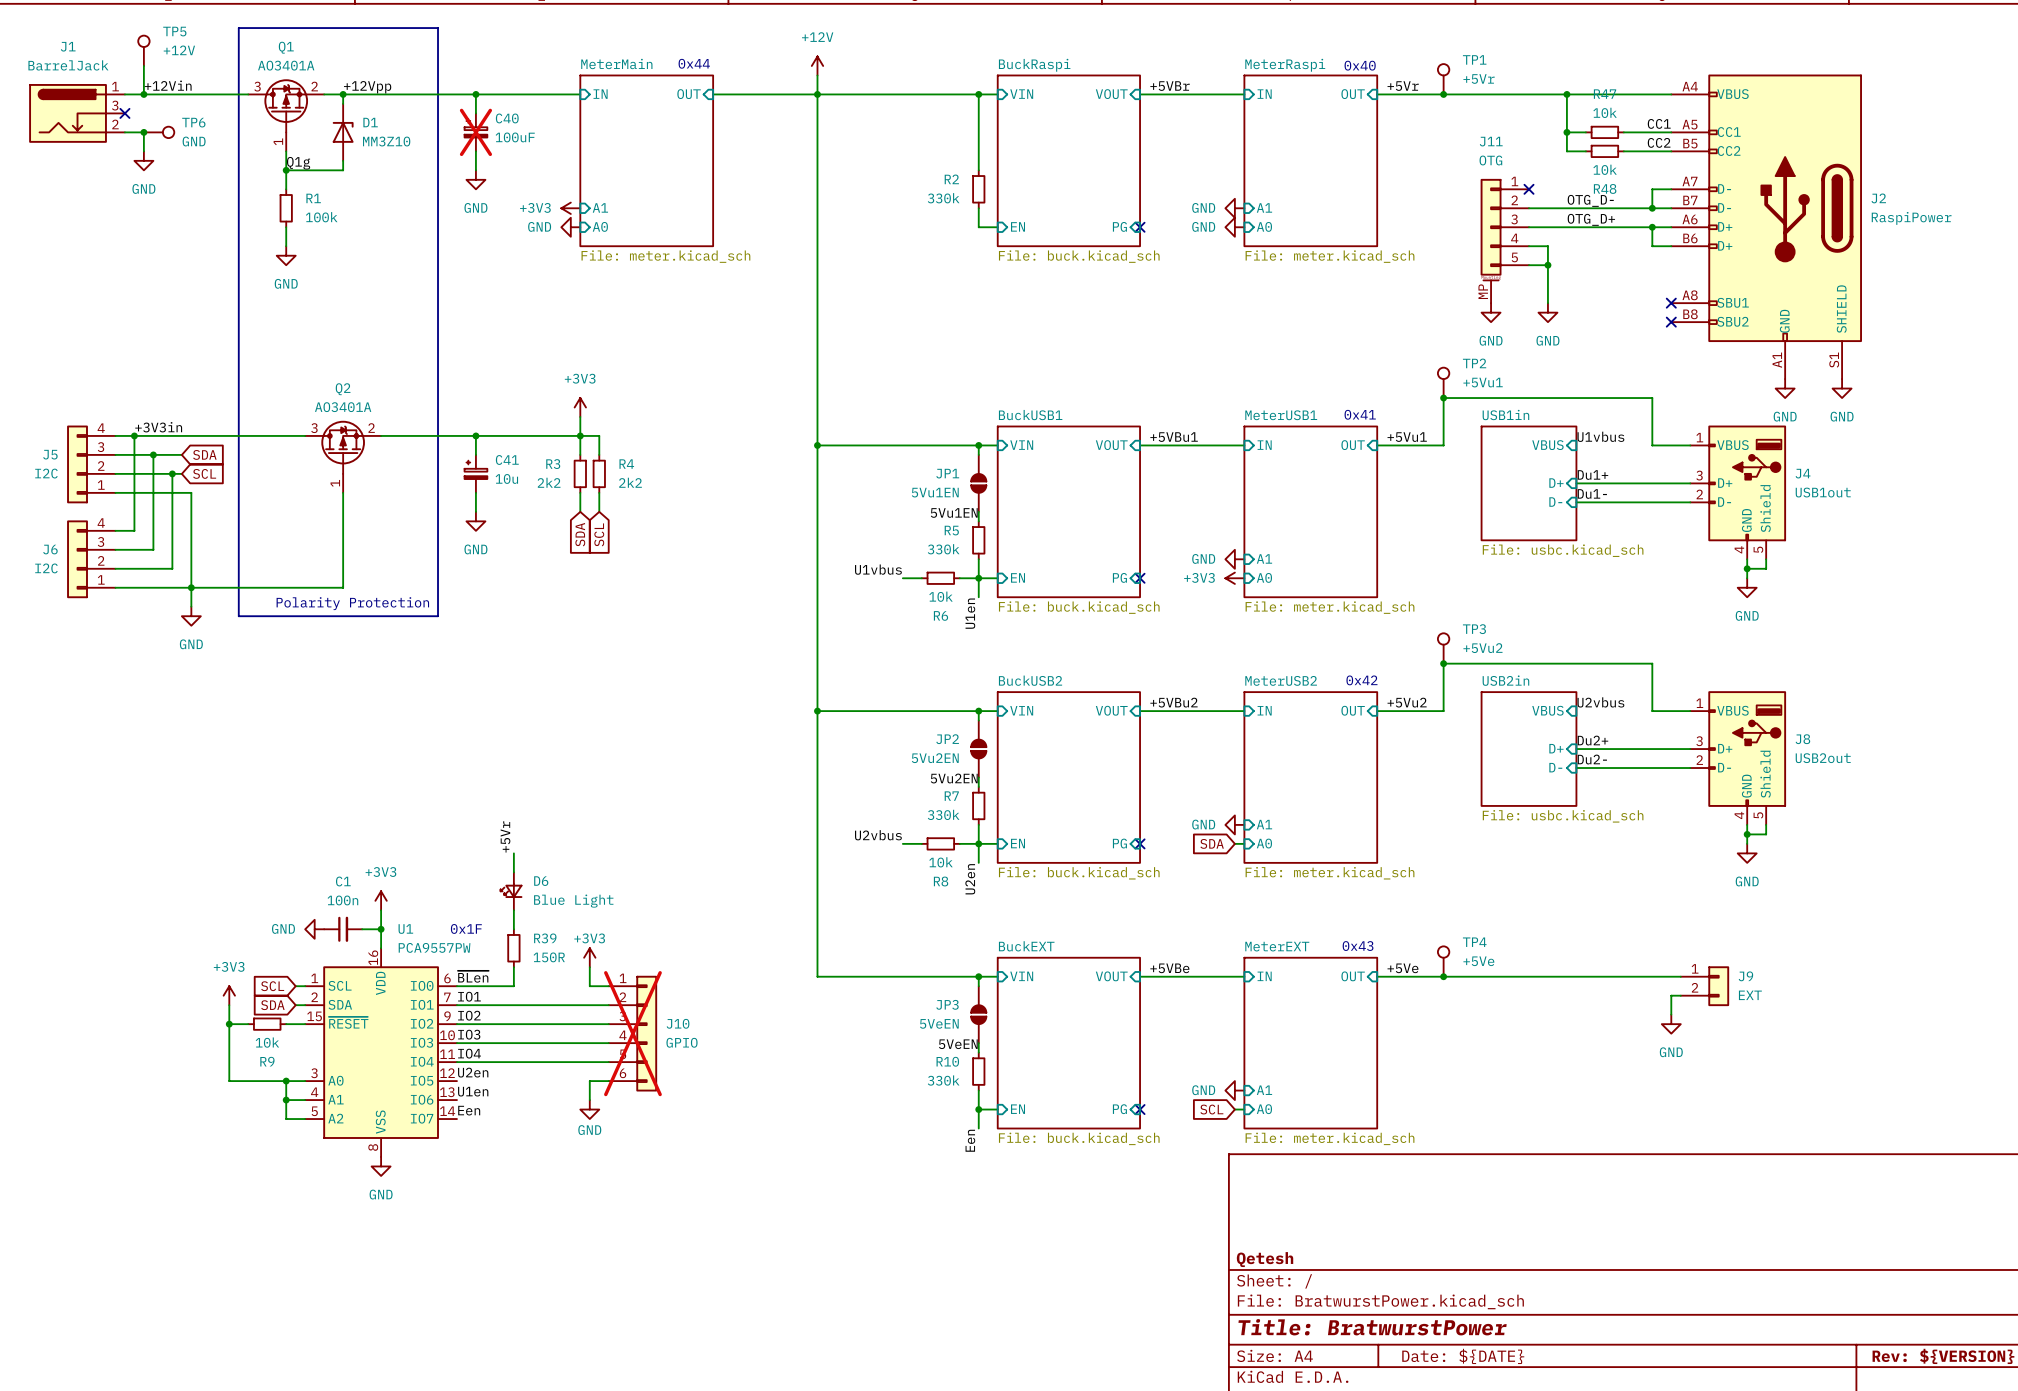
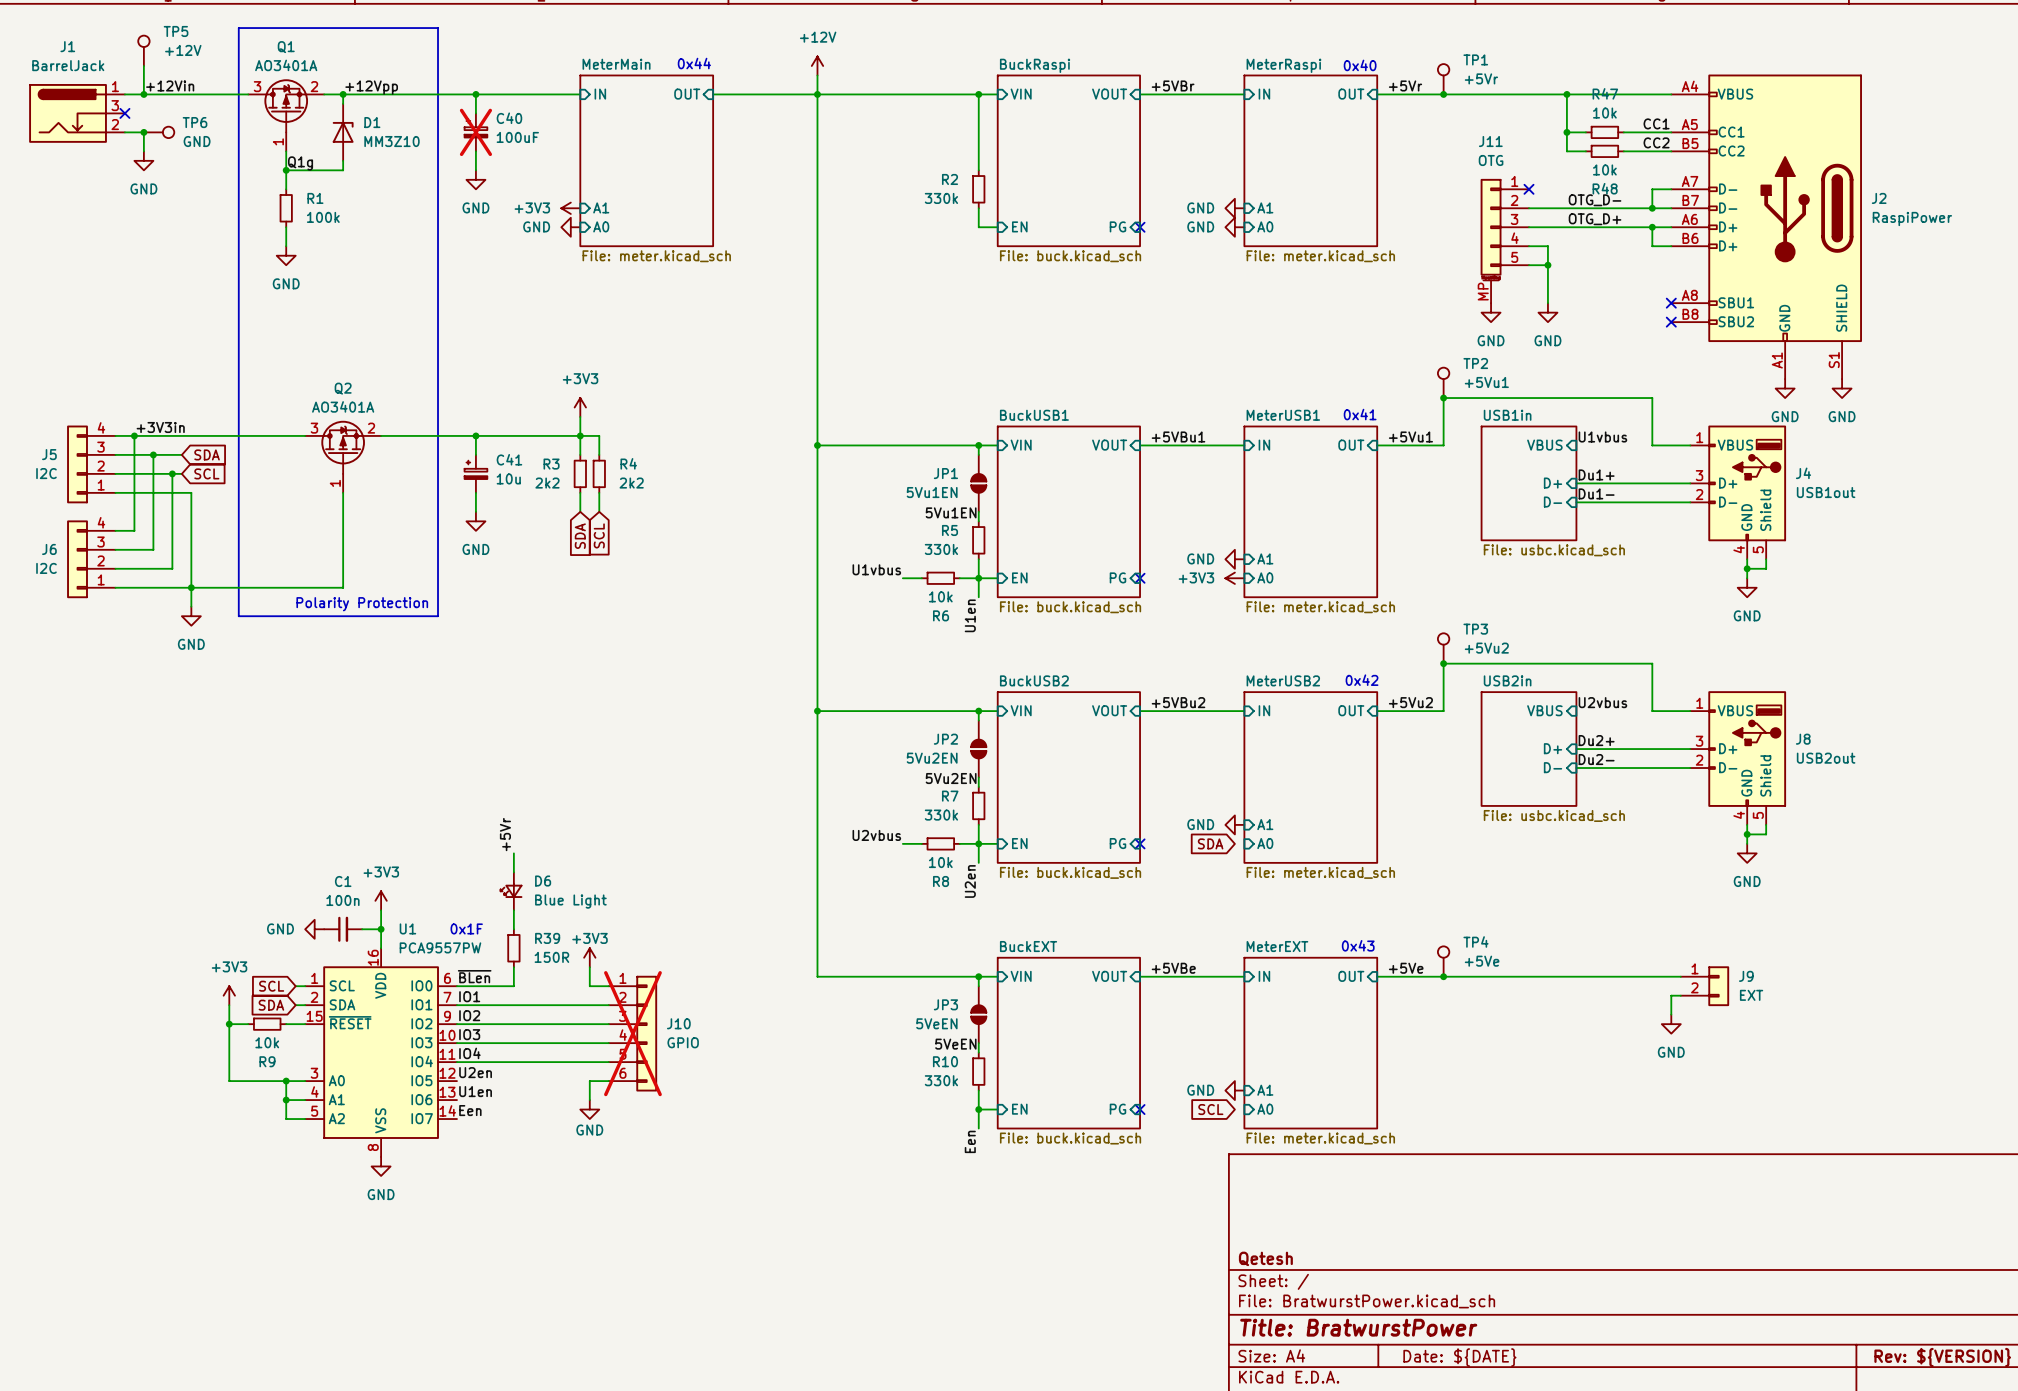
wire: (1234, 843) (1244, 843) -> none
wire: (1234, 1109) (1244, 1109) -> none

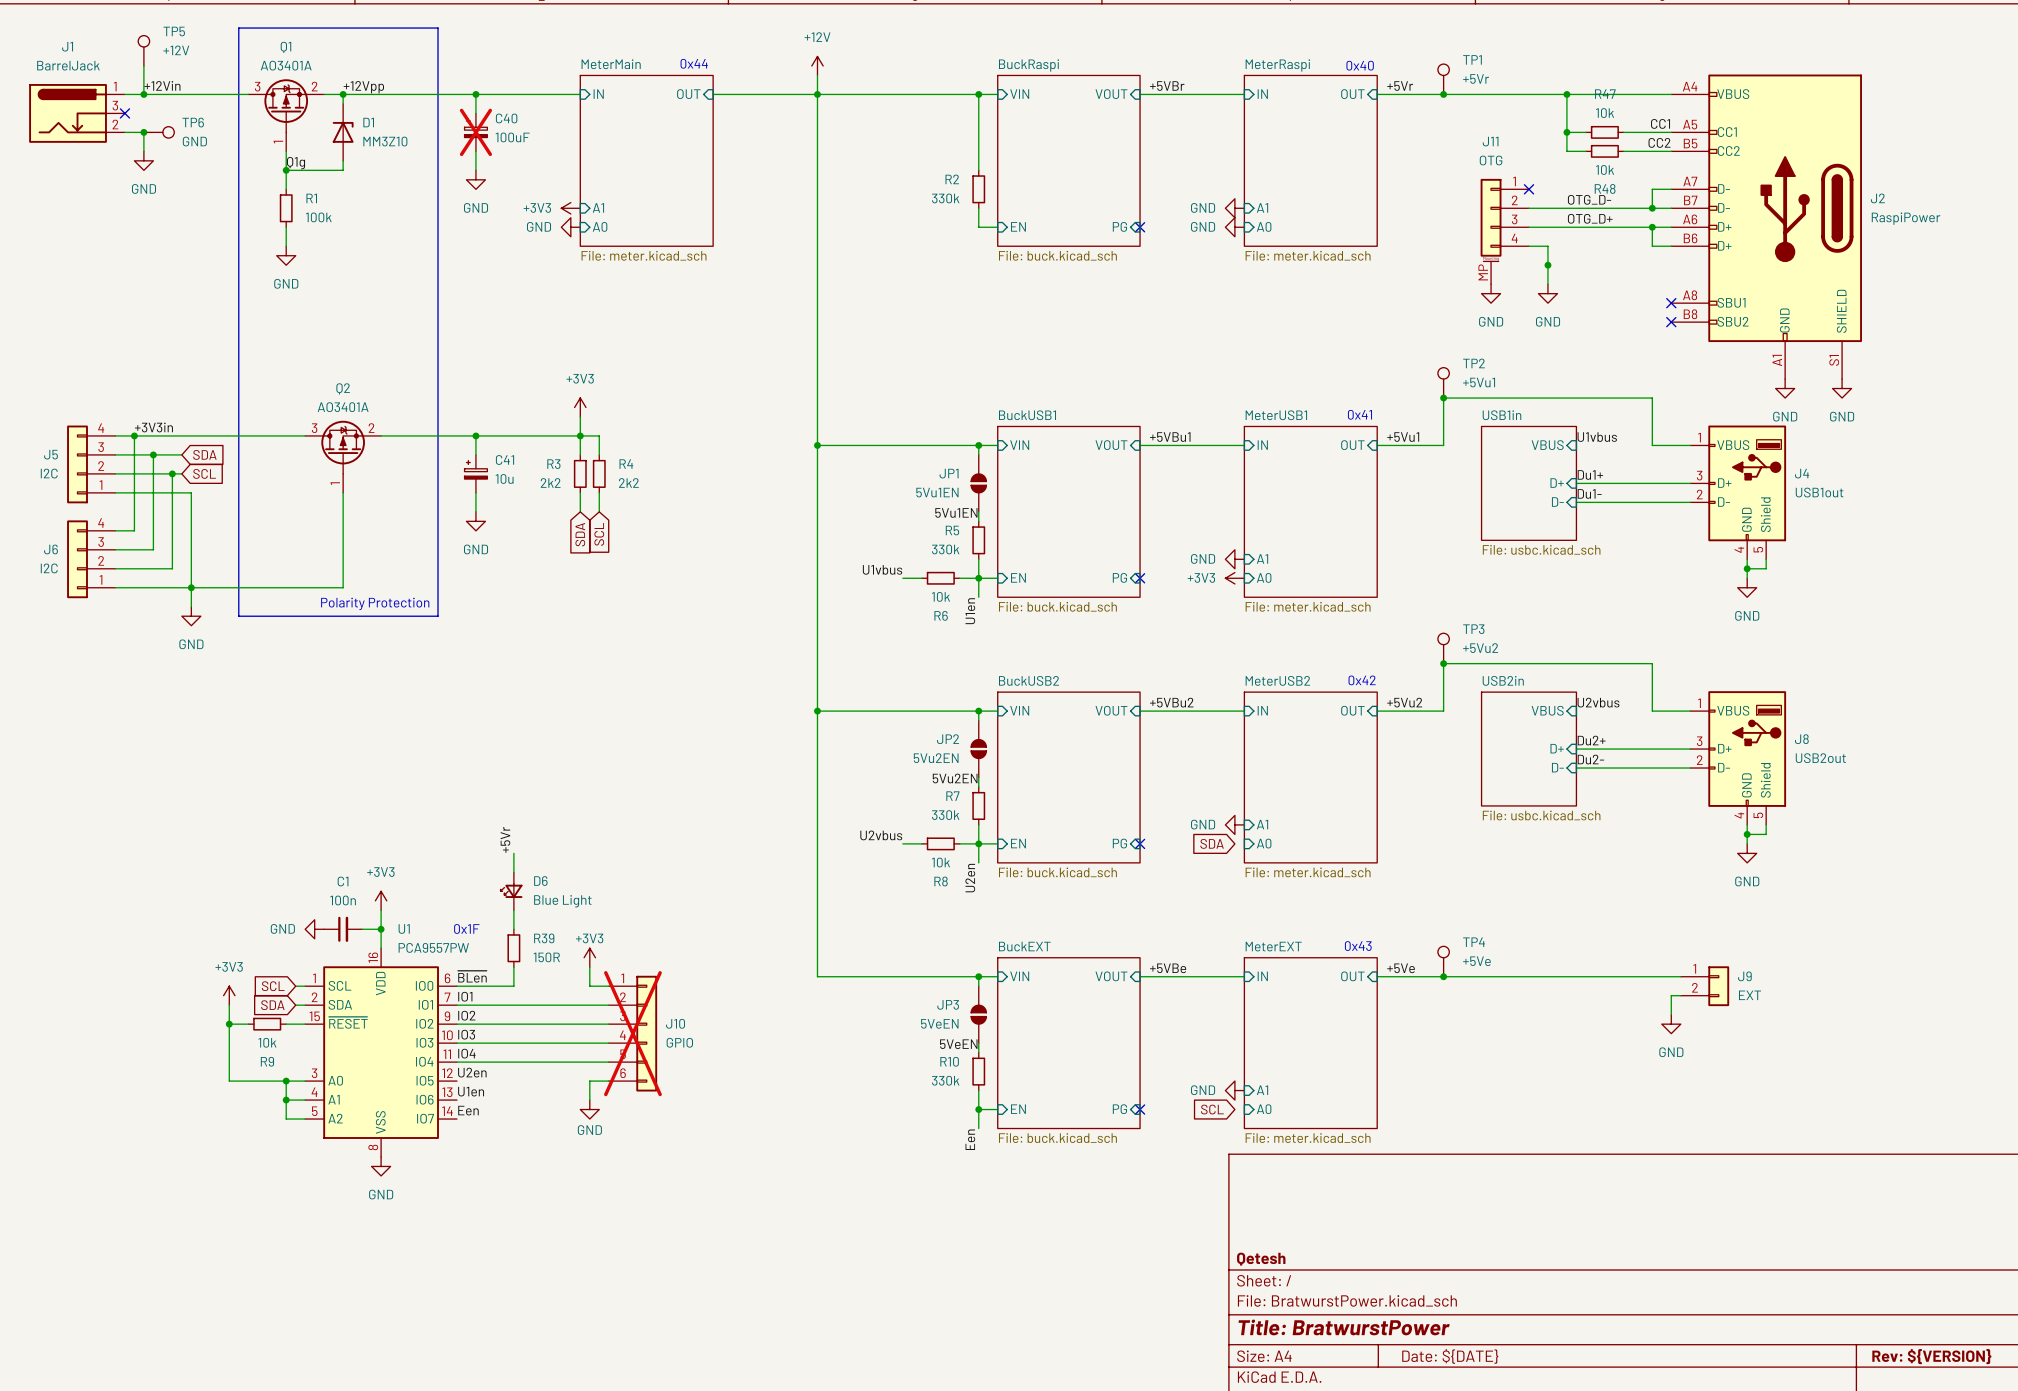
J11 symbol: [1480, 178, 1529, 304] -> [1480, 178, 1529, 285]
wire: (1528, 265) (1547, 265) -> none
power symbol position: GND (1491, 312) -> GND (1491, 293)
power symbol position: GND (1547, 312) -> GND (1547, 293)

